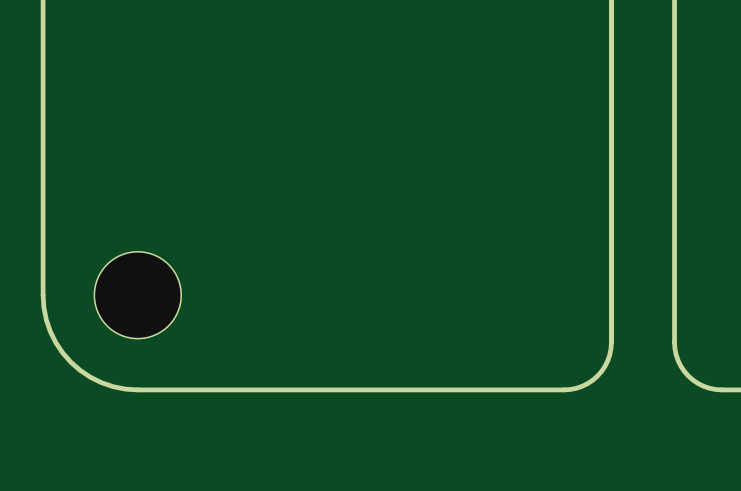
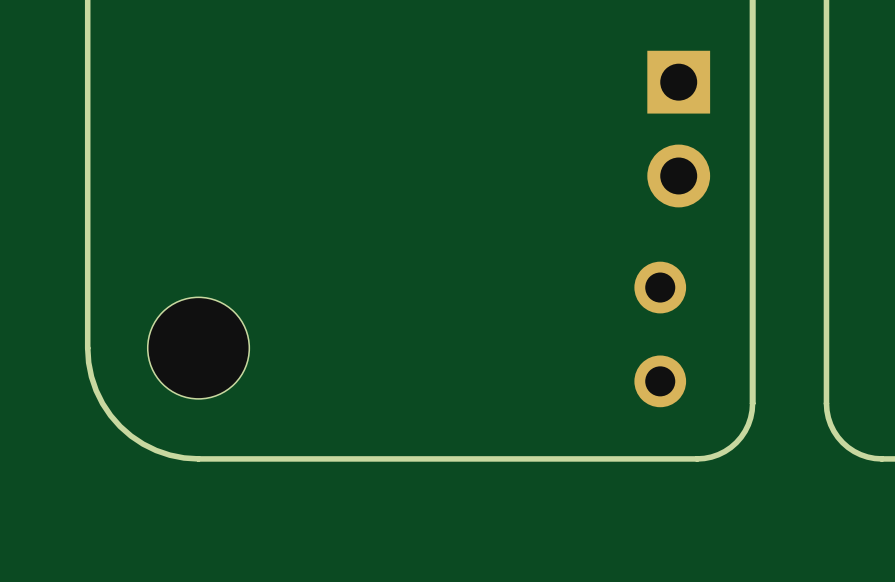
part: none -> (678, 129)
part: none -> (660, 334)

